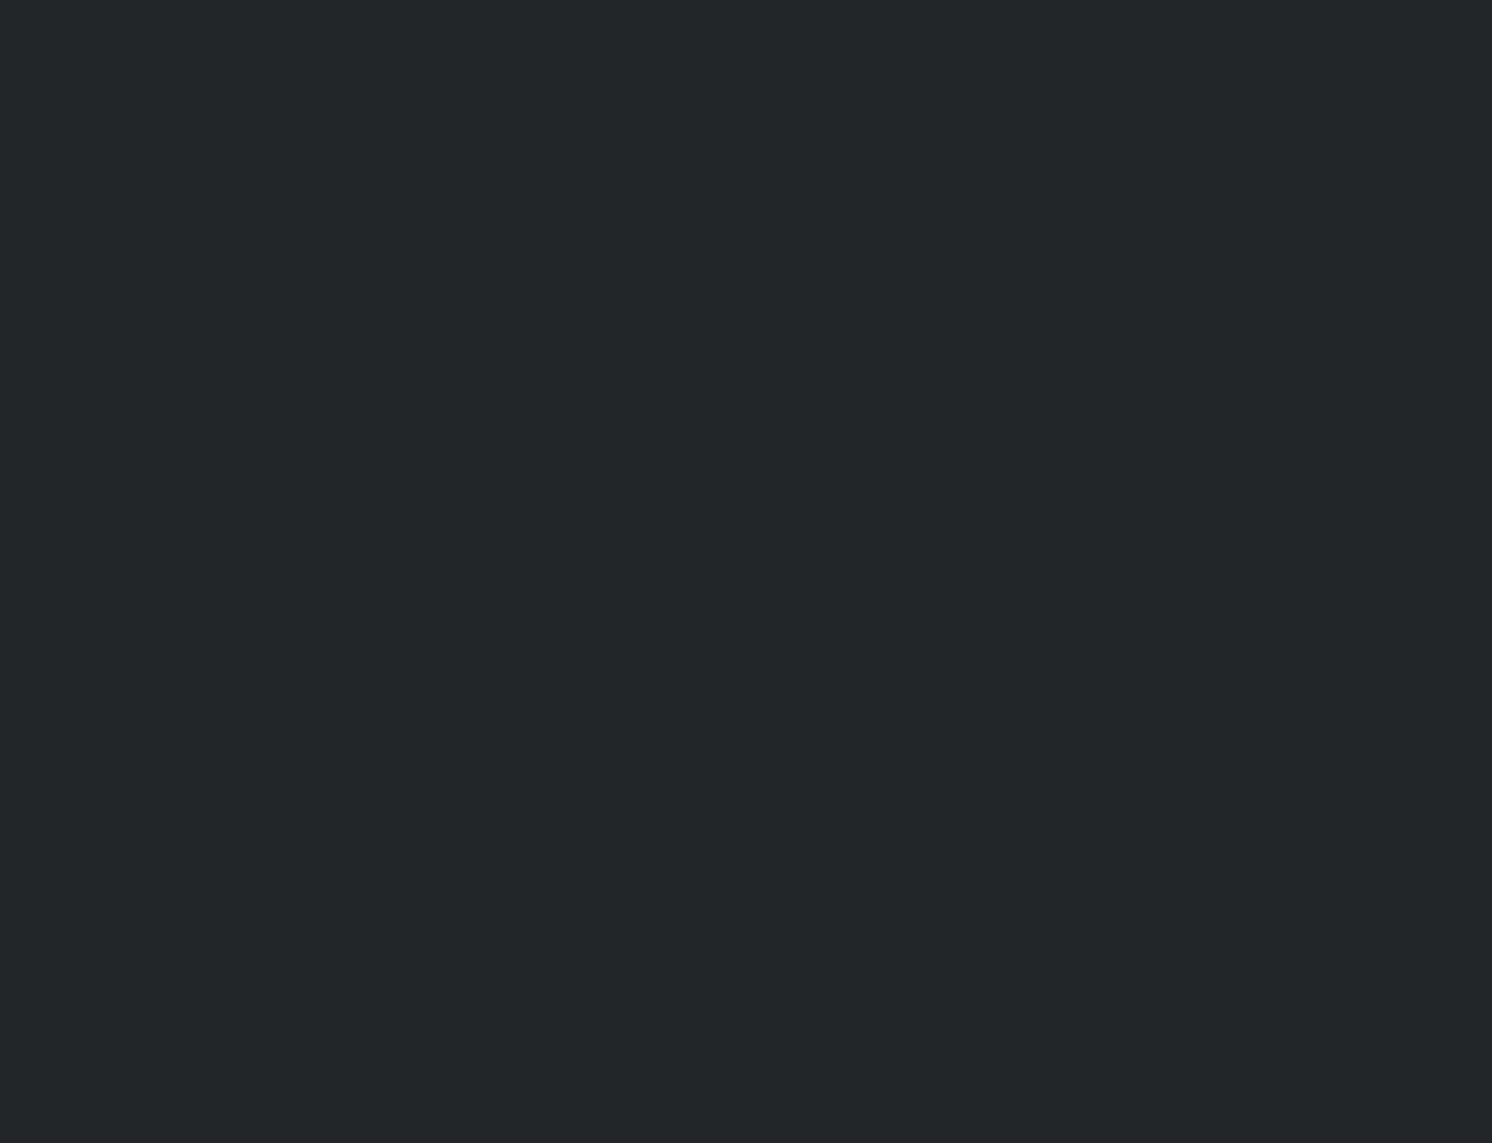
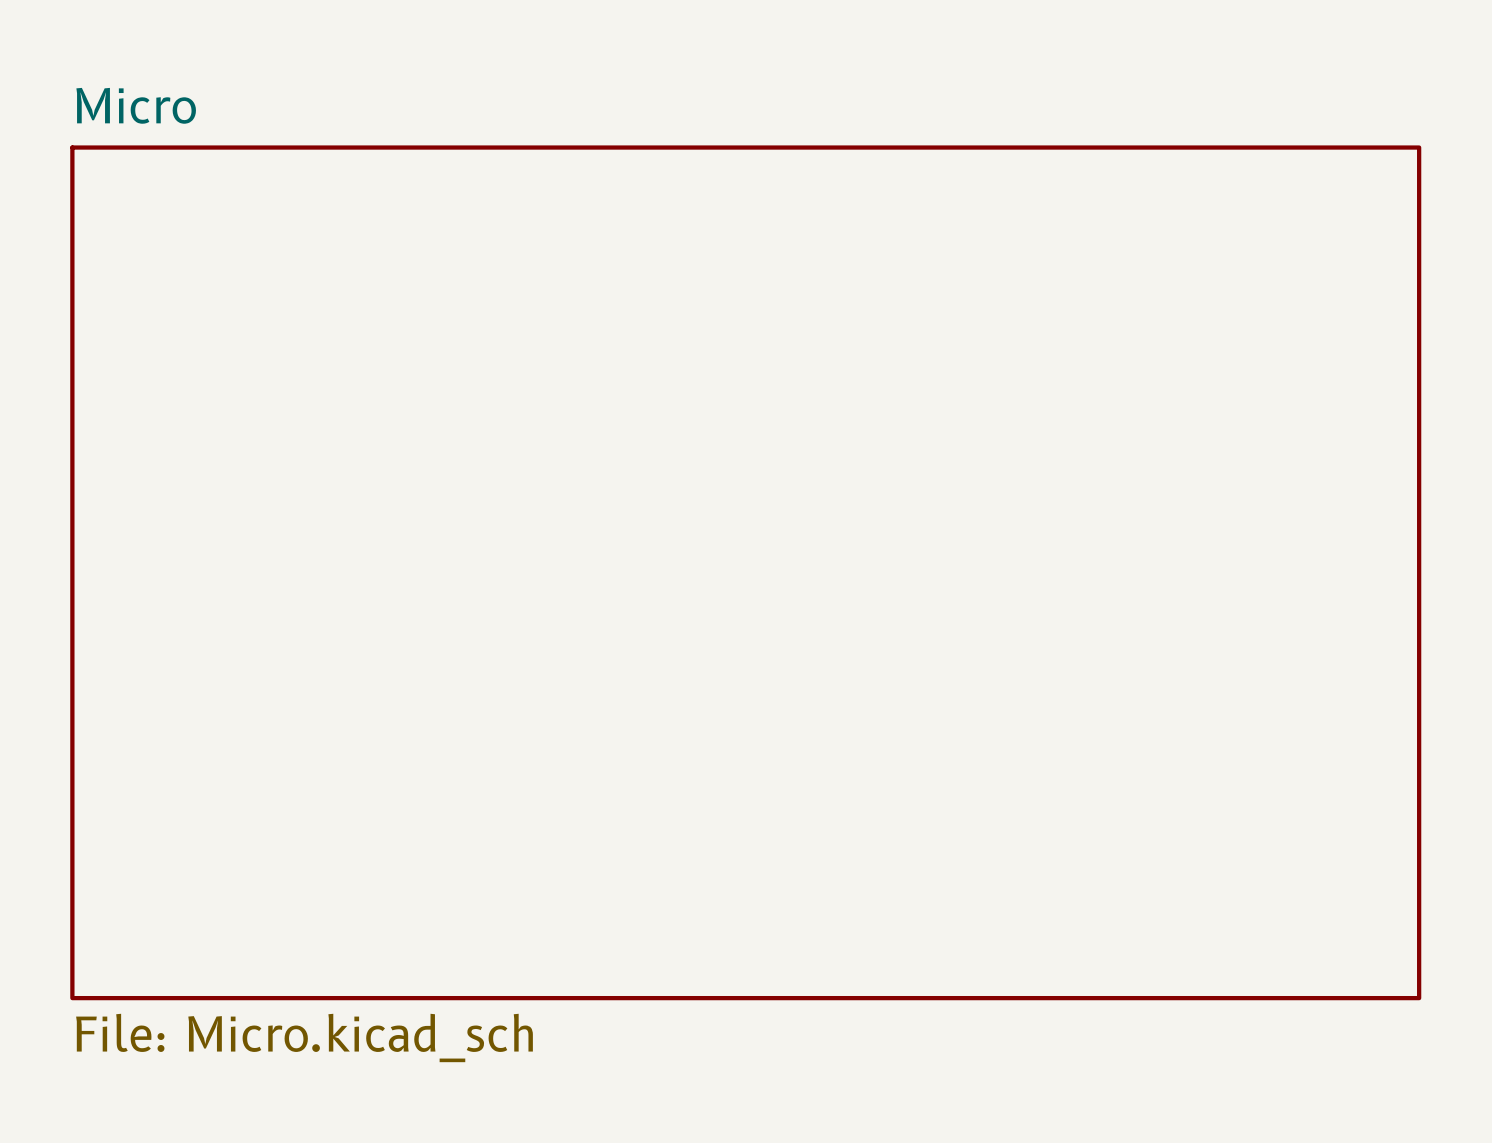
sheet Micro: none -> File: Micro.kicad_sch (745, 572)

